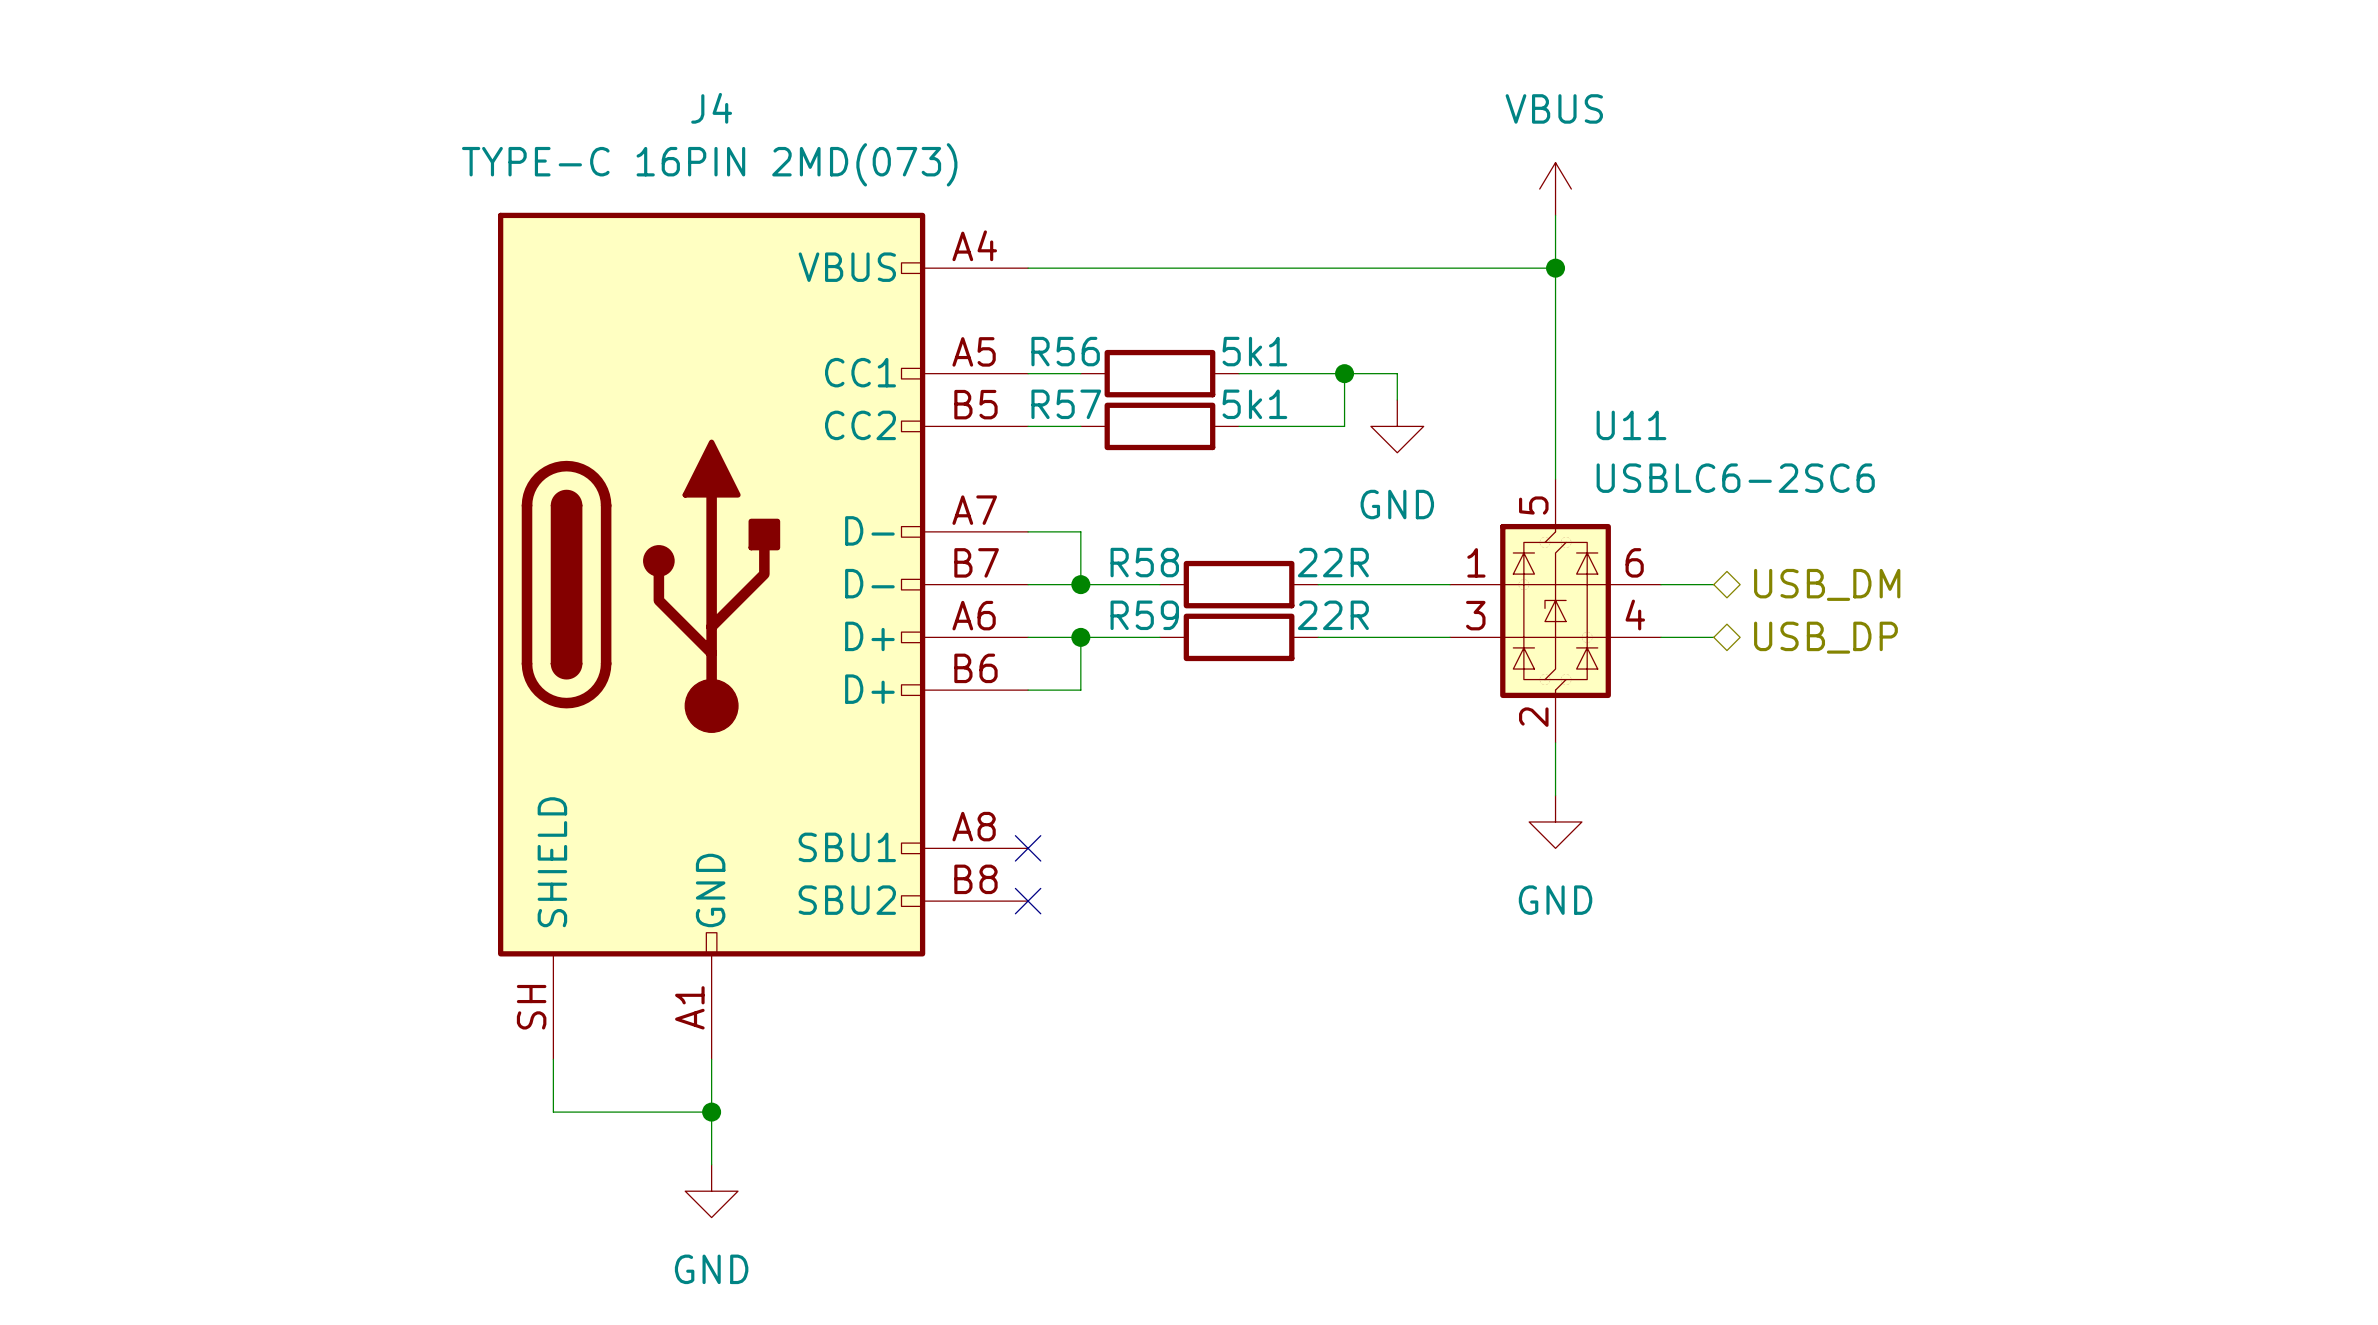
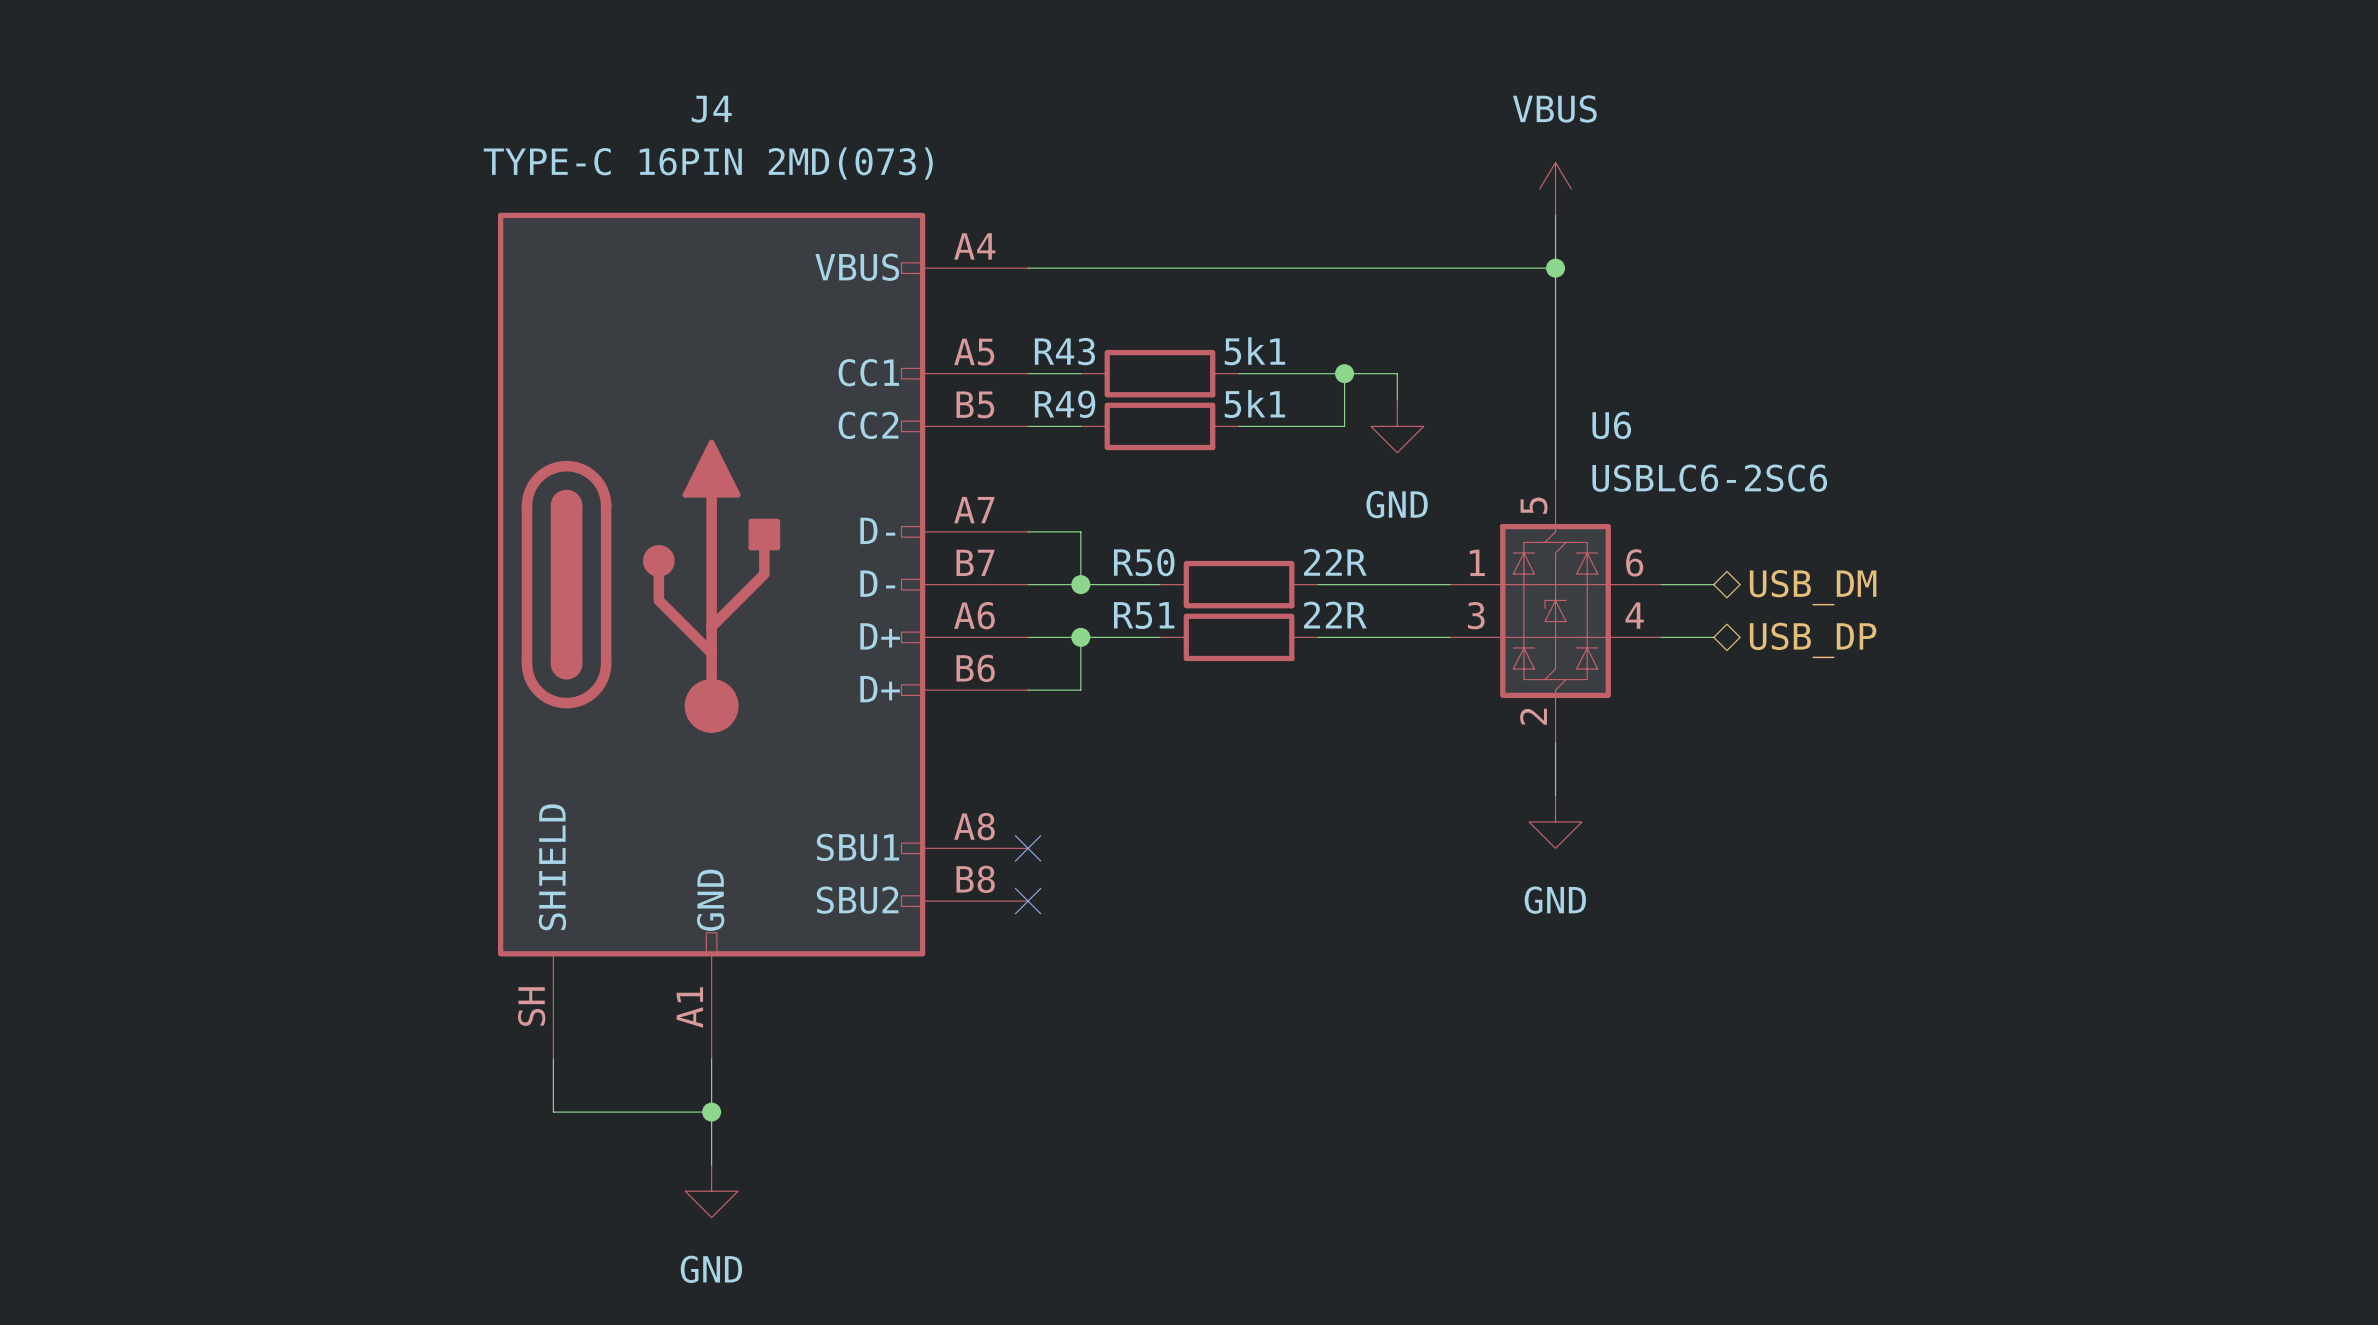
R56 name: R56 (1065, 351) -> R43 (1064, 351)
R57 name: R57 (1066, 404) -> R49 (1065, 404)
U11 name: U11 (1631, 425) -> U6 (1611, 425)
R58 name: R58 (1144, 562) -> R50 (1144, 562)
R59 name: R59 (1144, 615) -> R51 (1144, 615)

